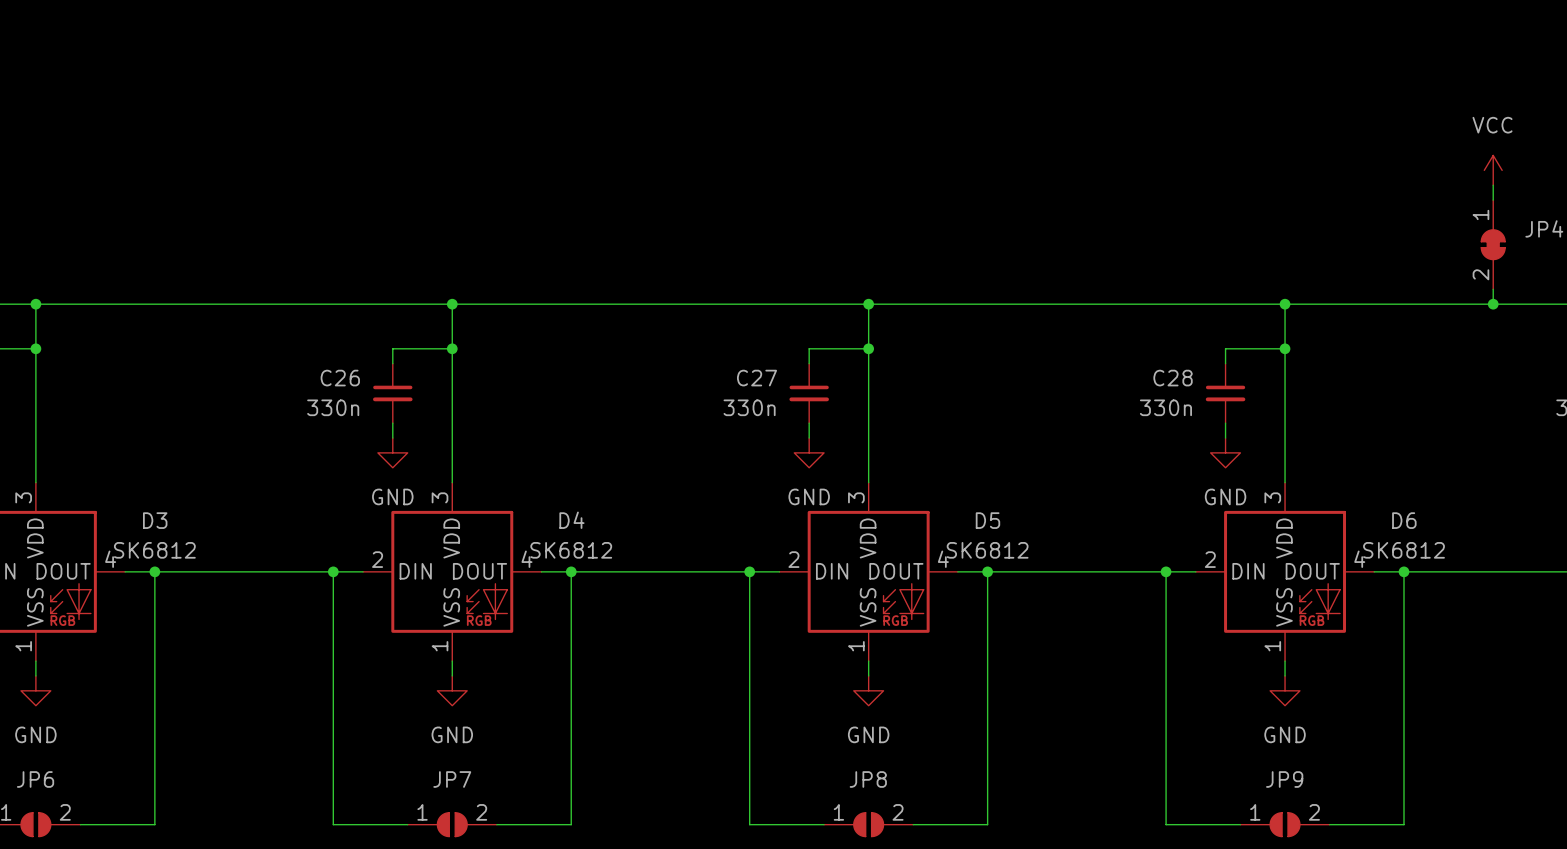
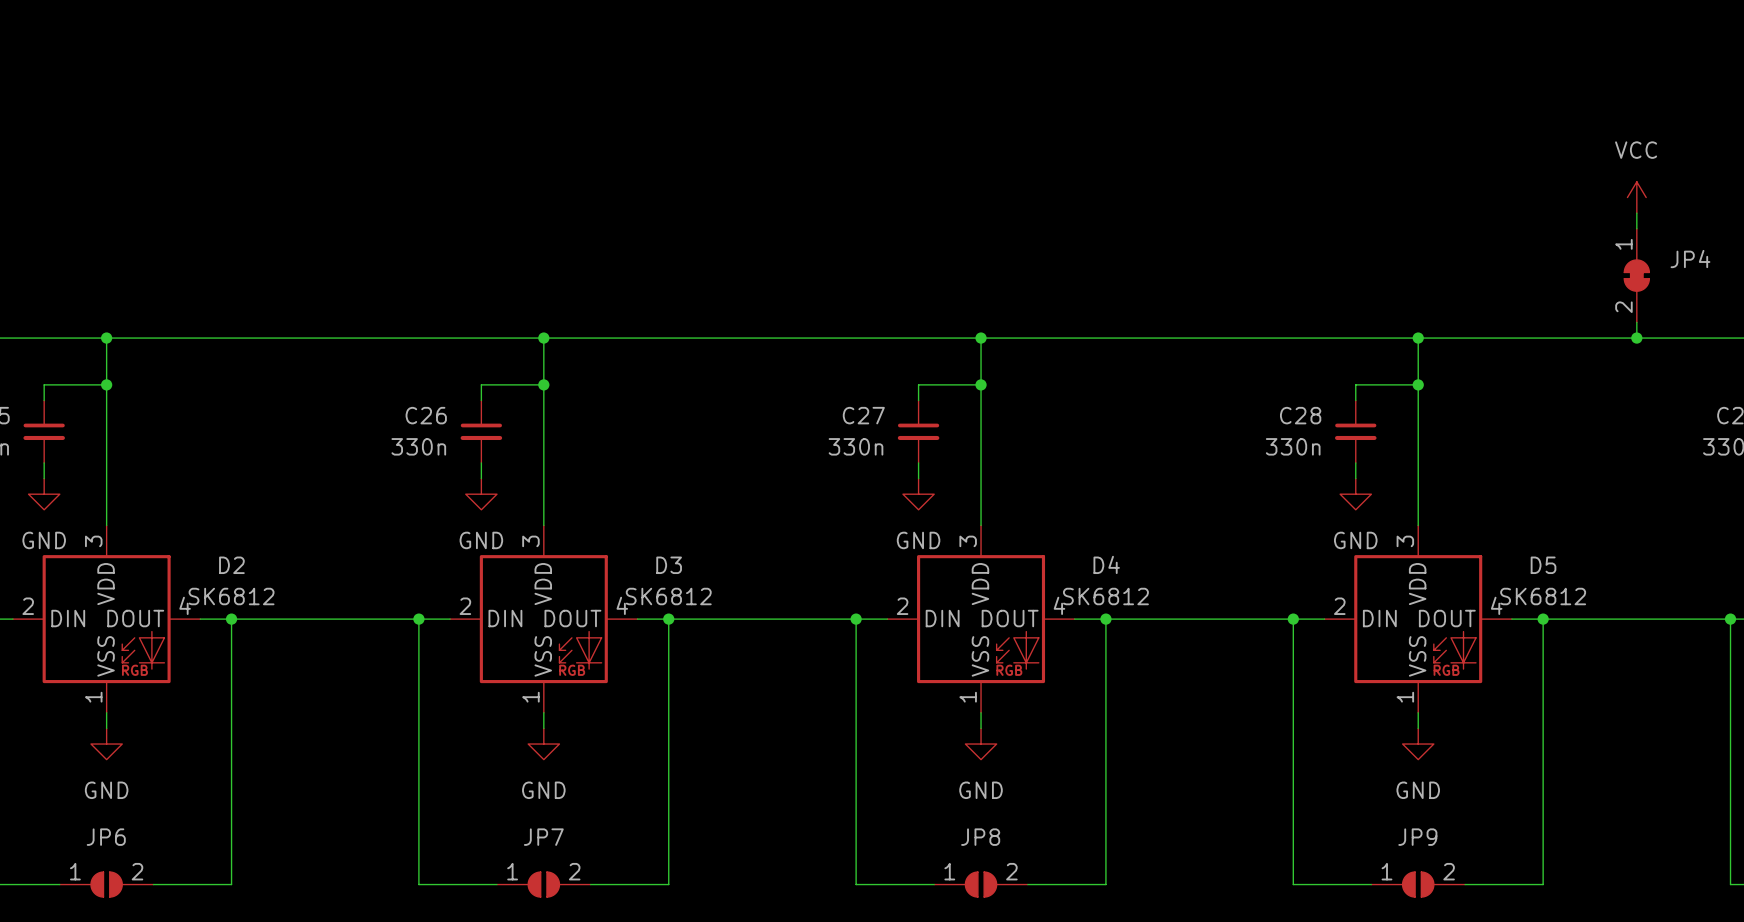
D3 name: D3 (155, 520) -> D2 (231, 565)
D4 name: D4 (571, 520) -> D3 (669, 565)
D5 name: D5 (987, 520) -> D4 (1106, 564)
D6 name: D6 (1404, 520) -> D5 (1543, 565)

